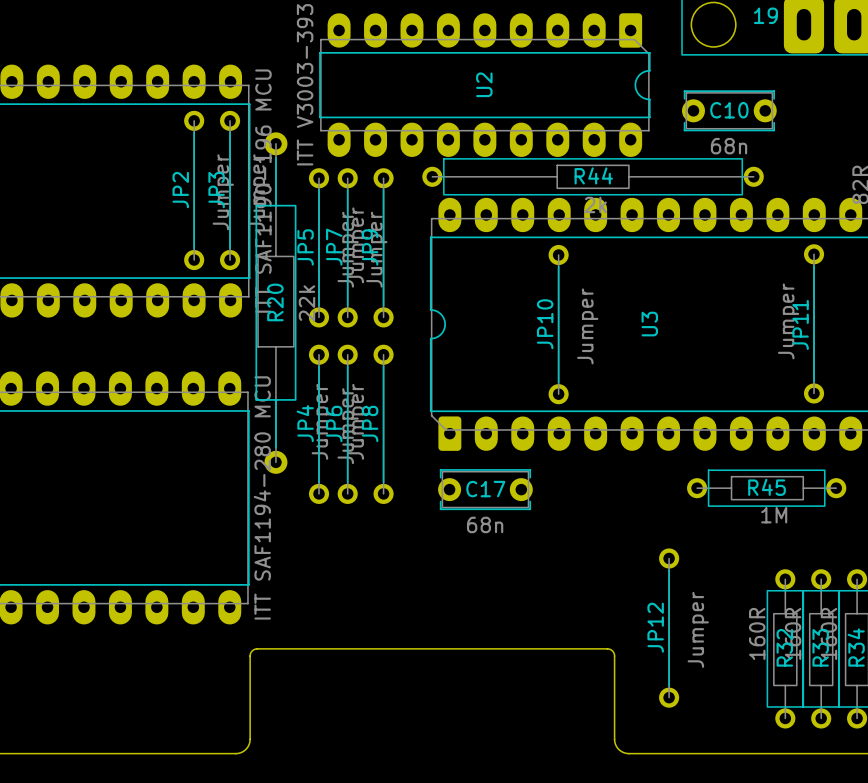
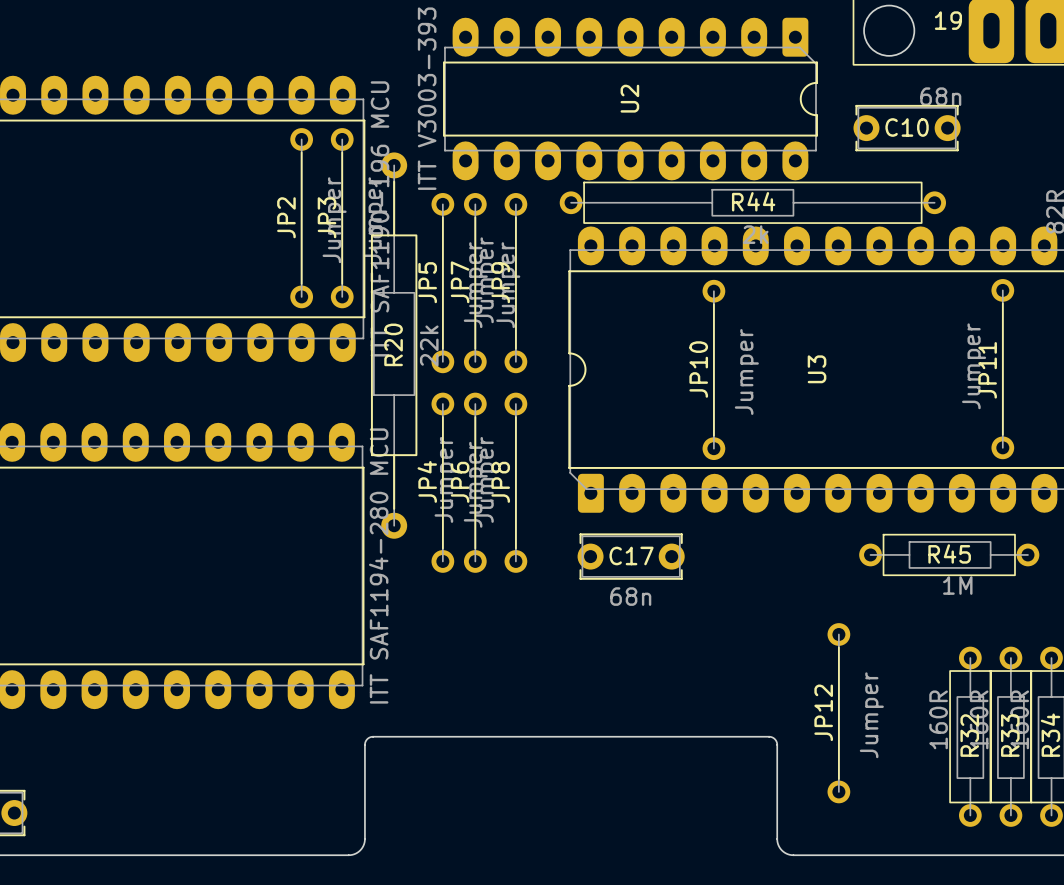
C10 value position: 68n (729, 146) -> 68n (940, 96)

